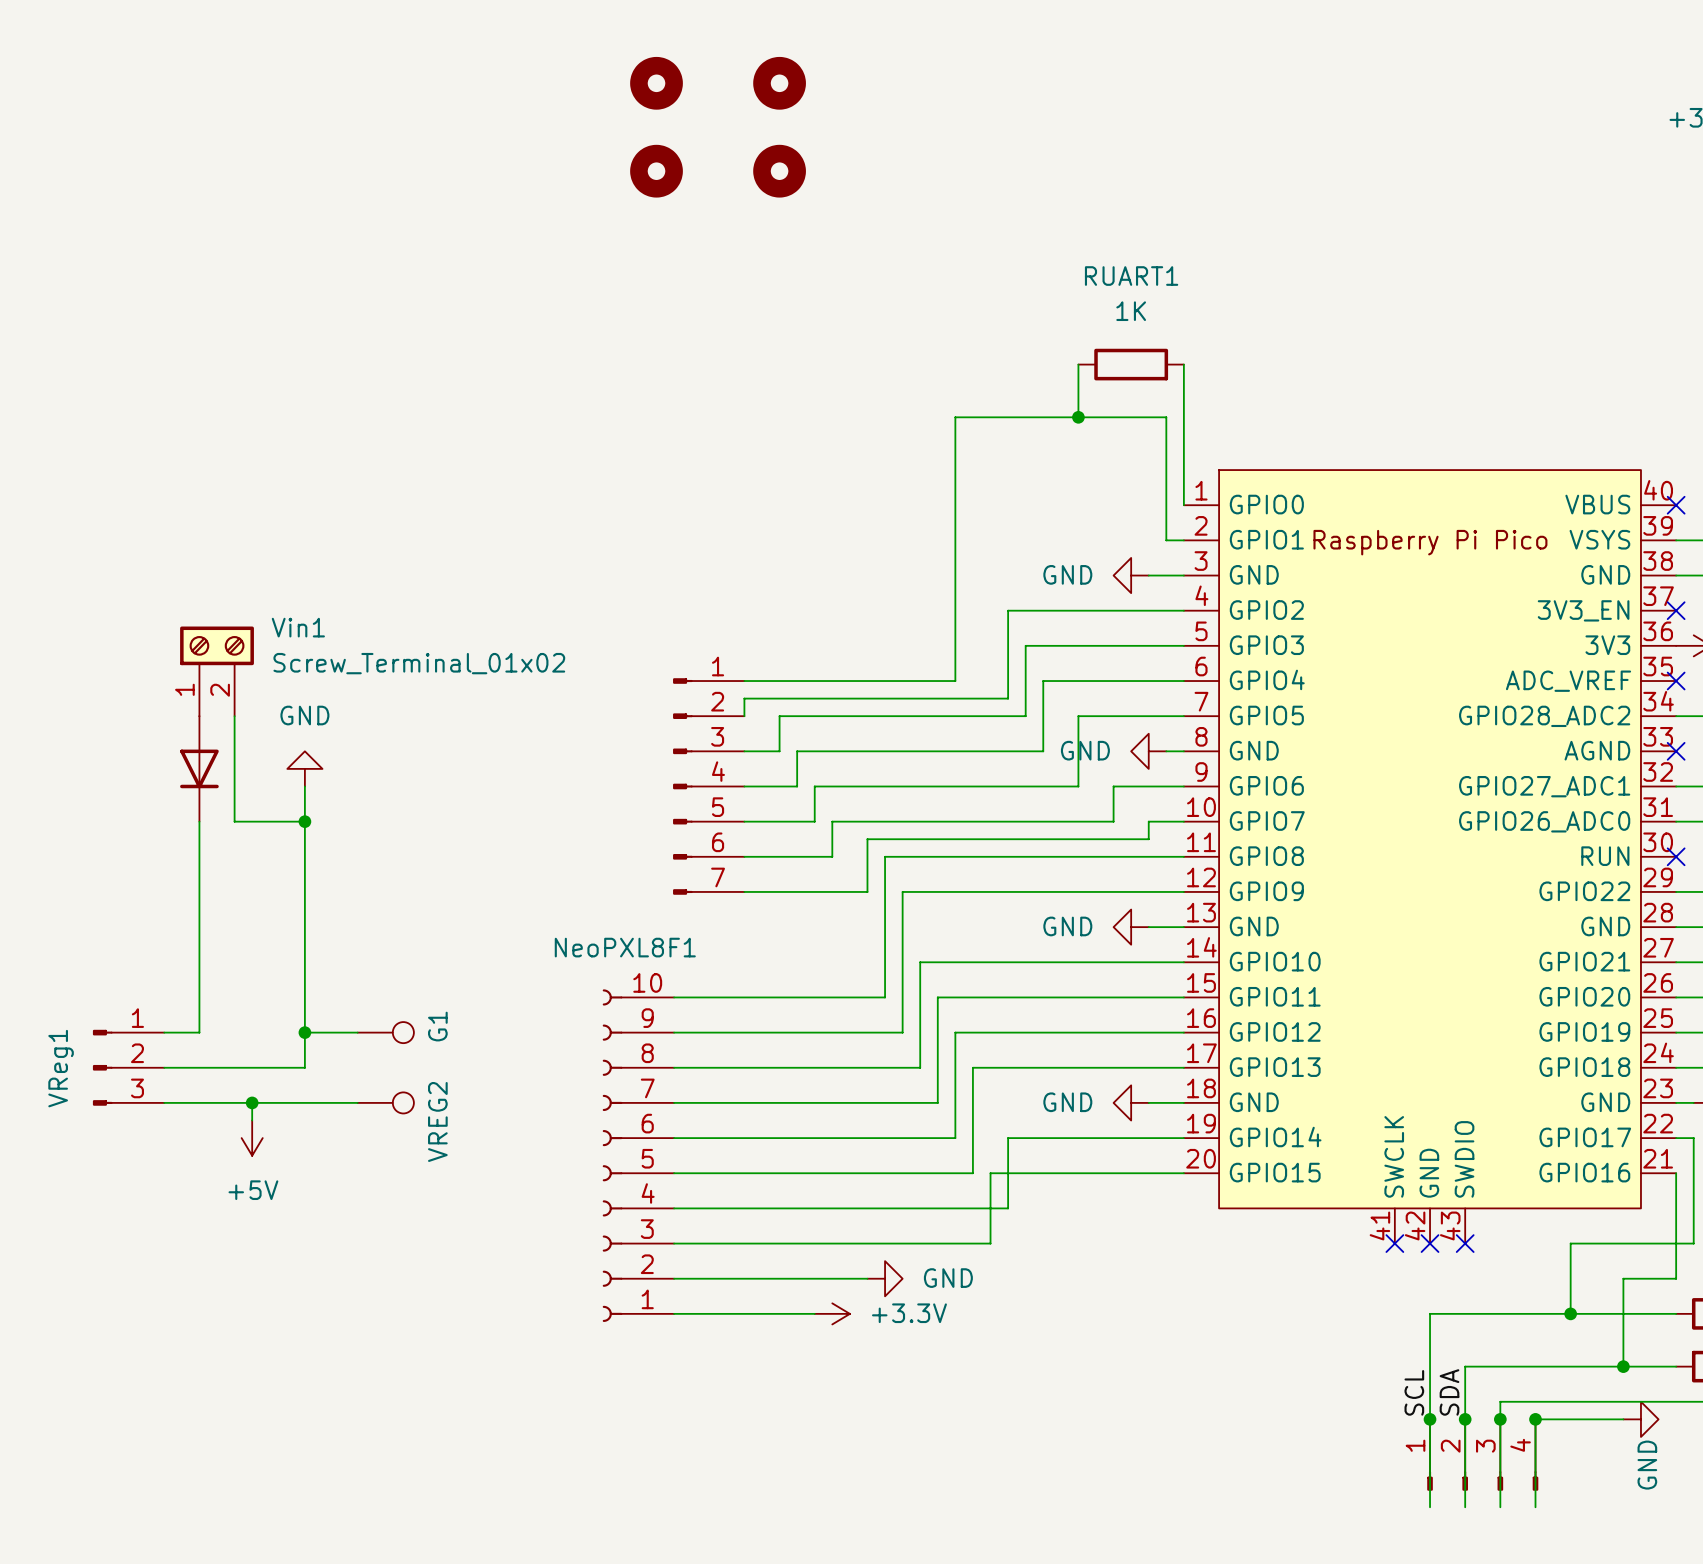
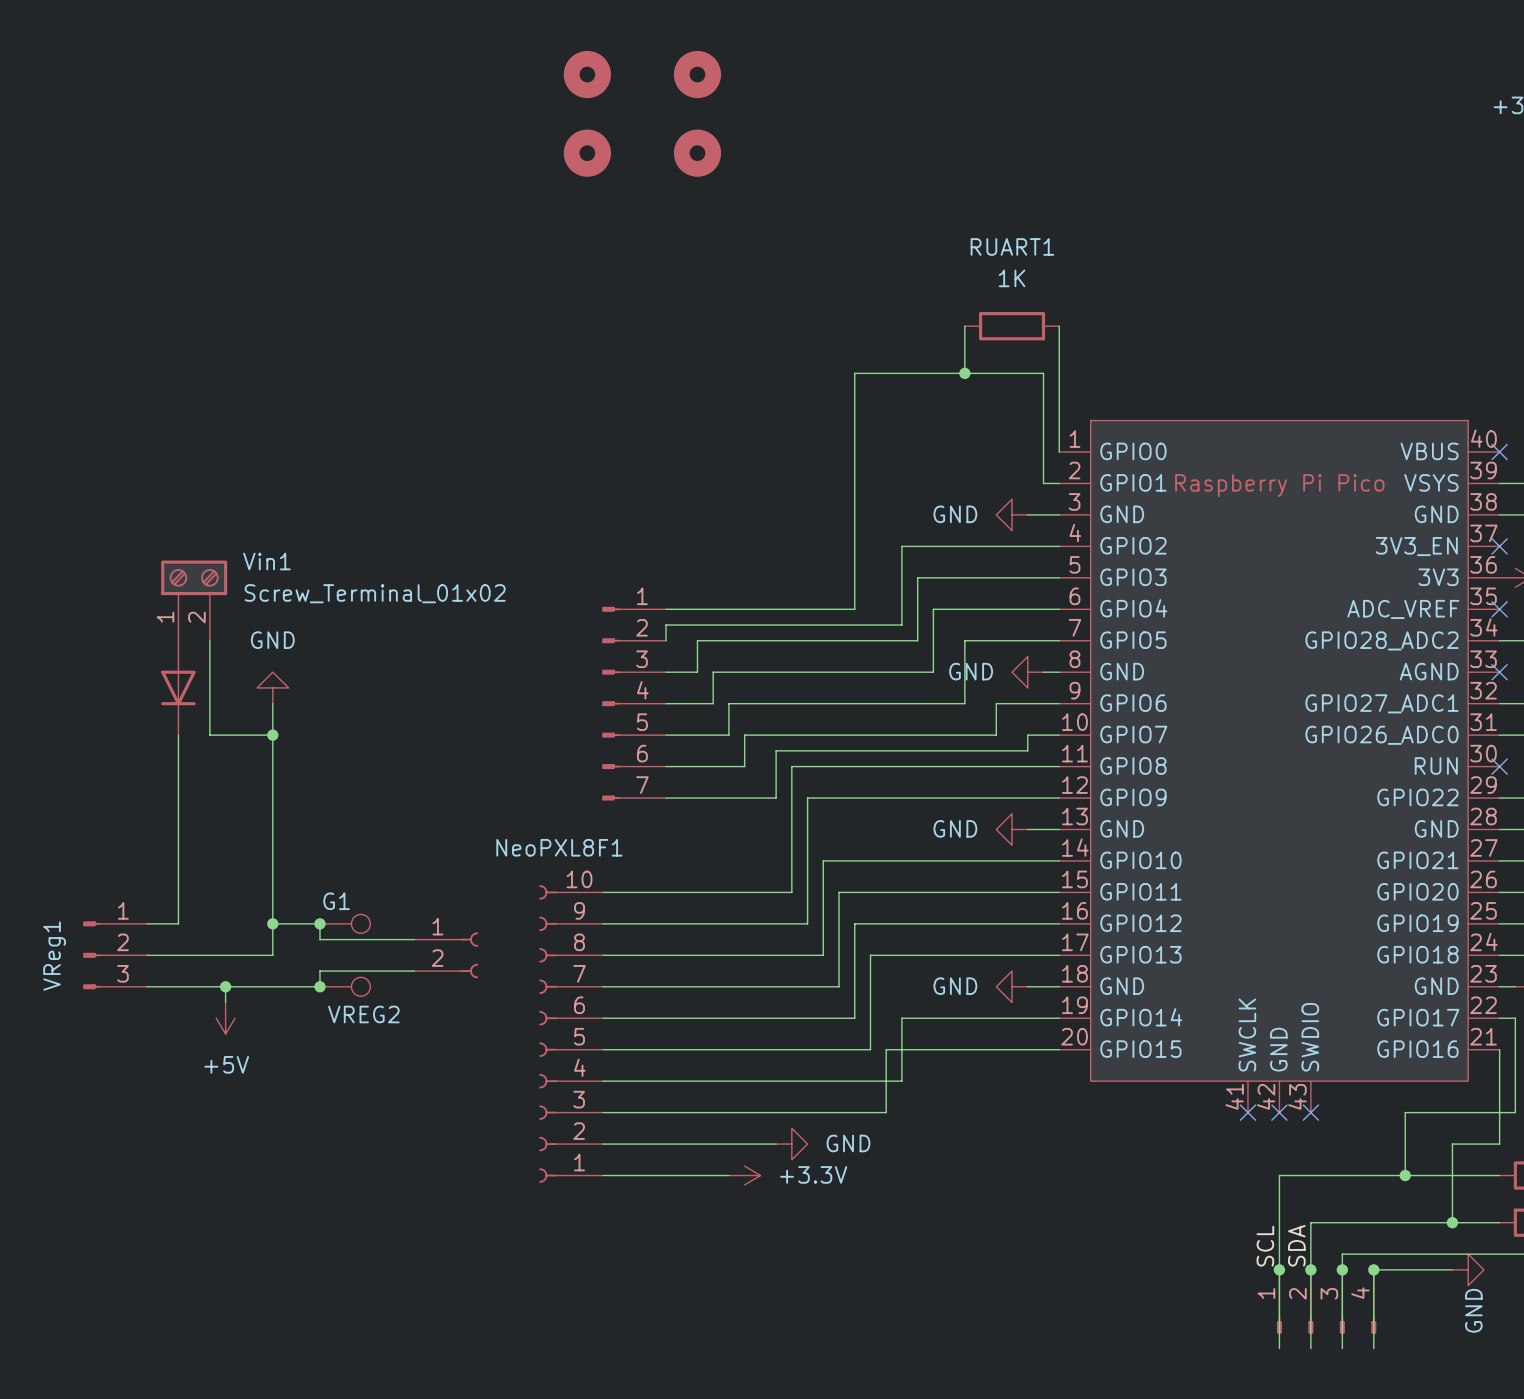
G1 name rotation: 0° (437, 1026) -> 90° clockwise (336, 901)
G1 name position: G1 (437, 1026) -> G1 (336, 901)
wire: none -> (319, 923) (319, 939) (414, 939)
junction: none -> (319, 923)
part: none -> (446, 955)
wire: none -> (414, 971) (319, 971) (319, 986)
junction: none -> (319, 986)
VREG2 name rotation: 0° (437, 1121) -> 90° clockwise (363, 1014)

